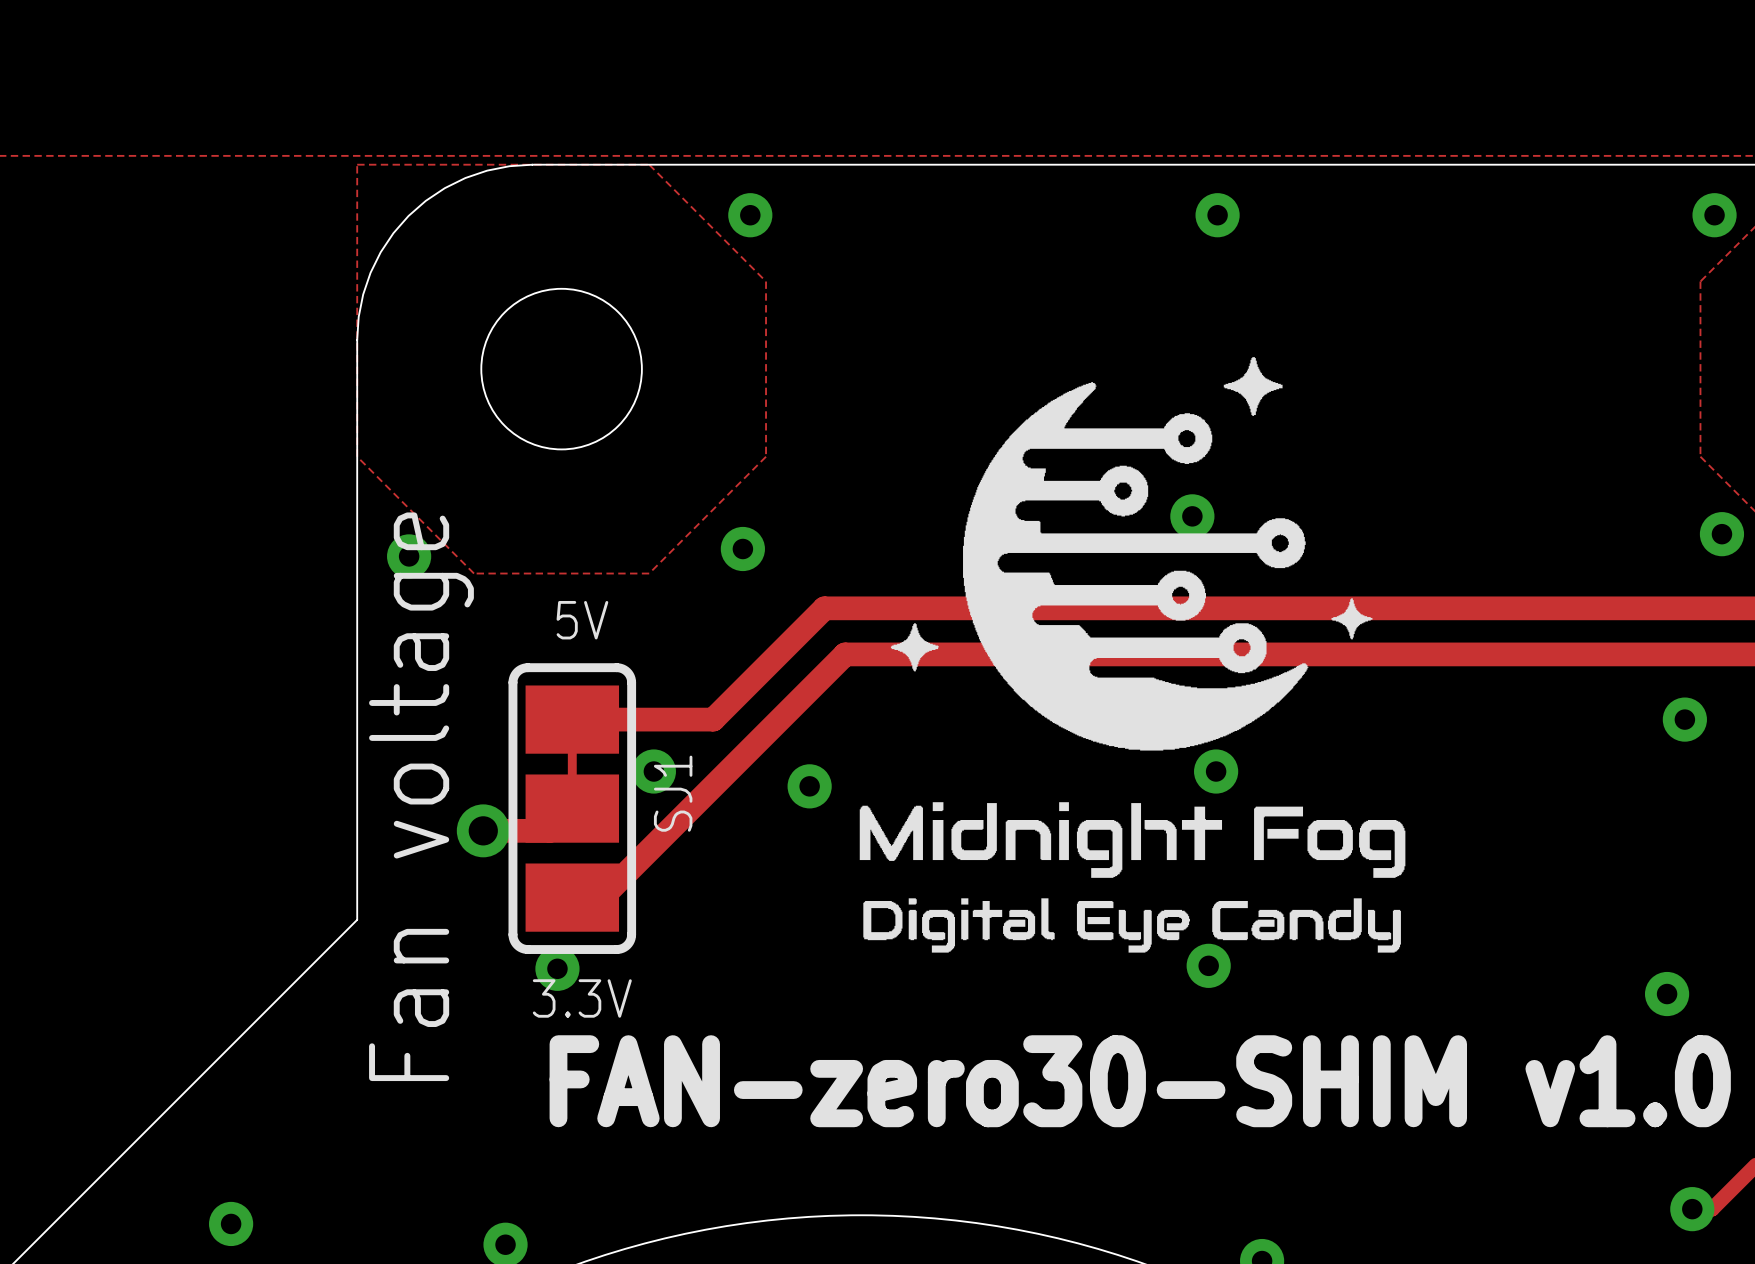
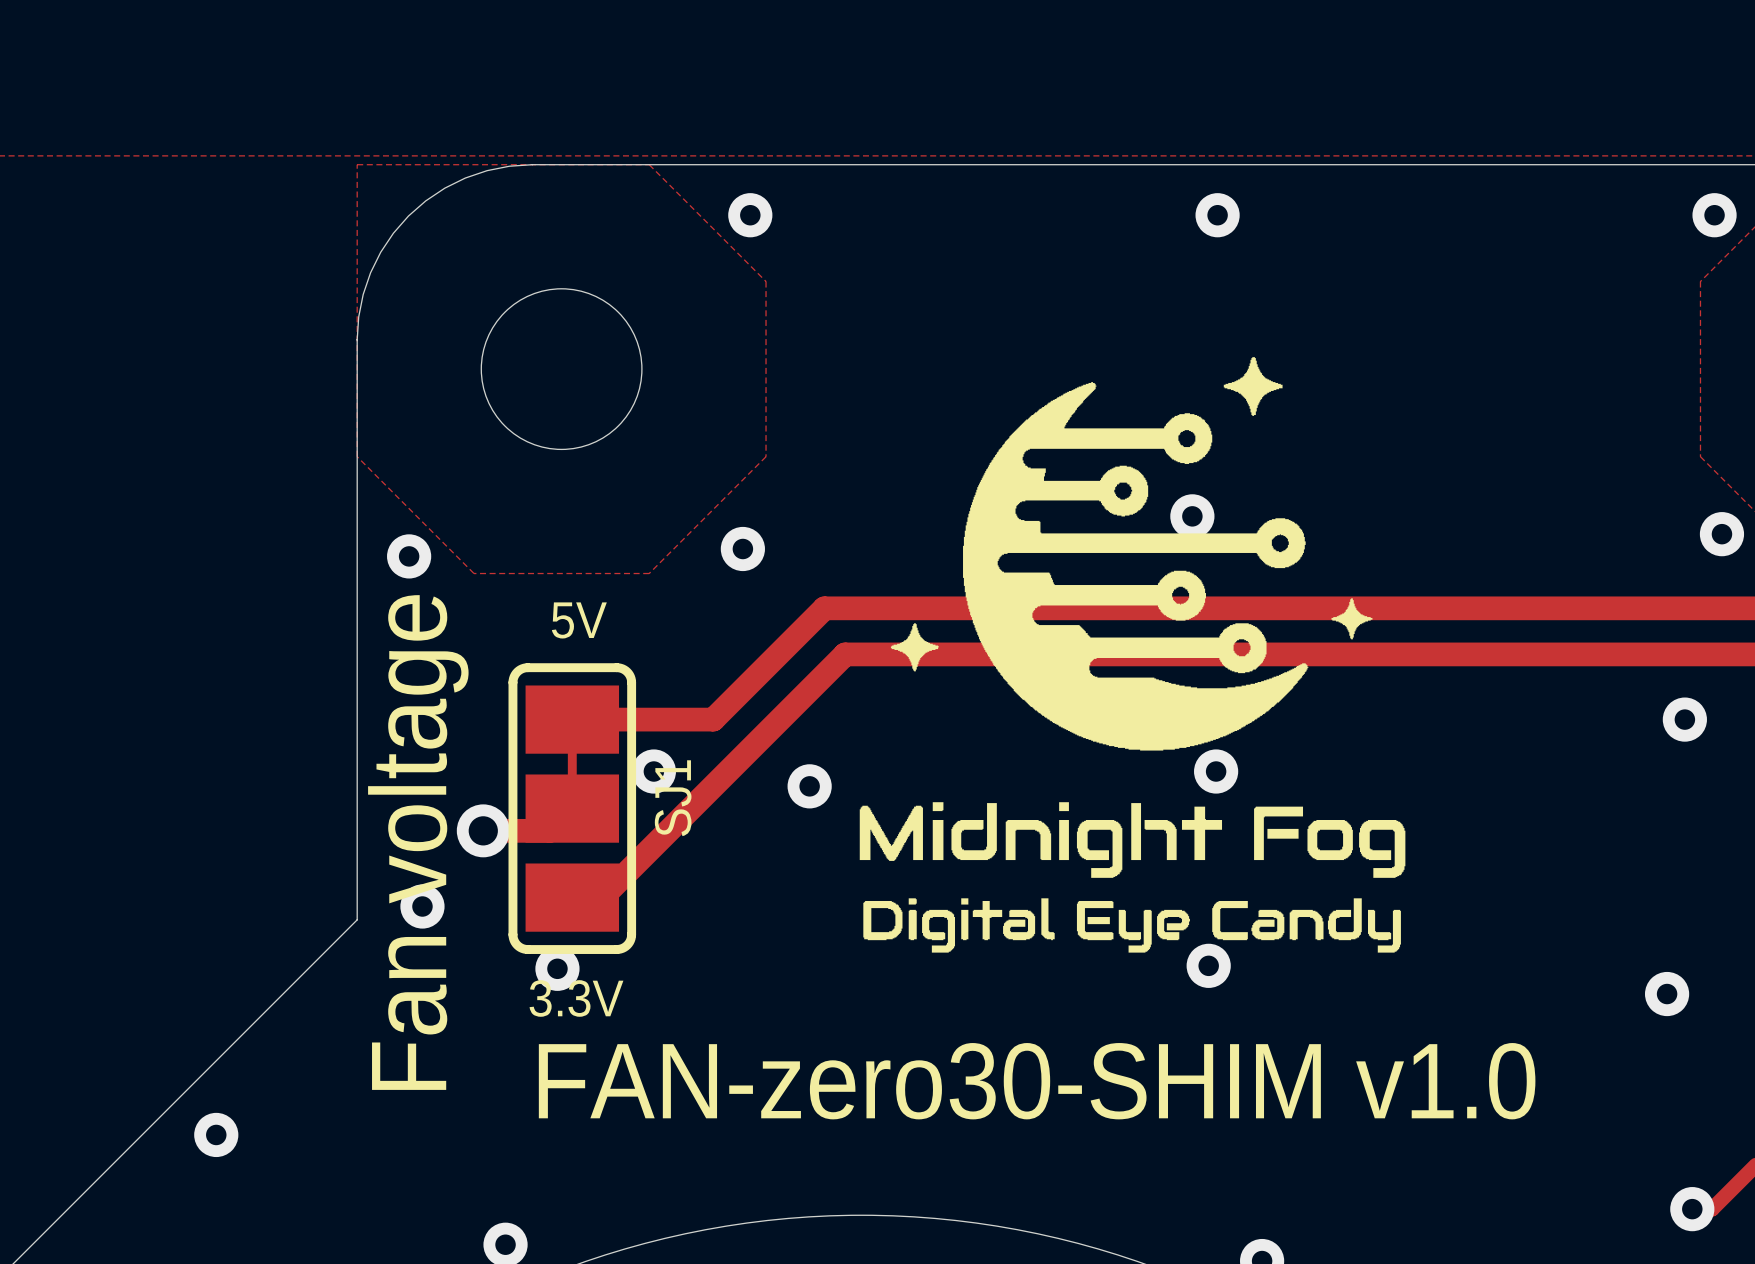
via: none -> (422, 906)
via: none -> (216, 1134)
via: (231, 1223) -> none

